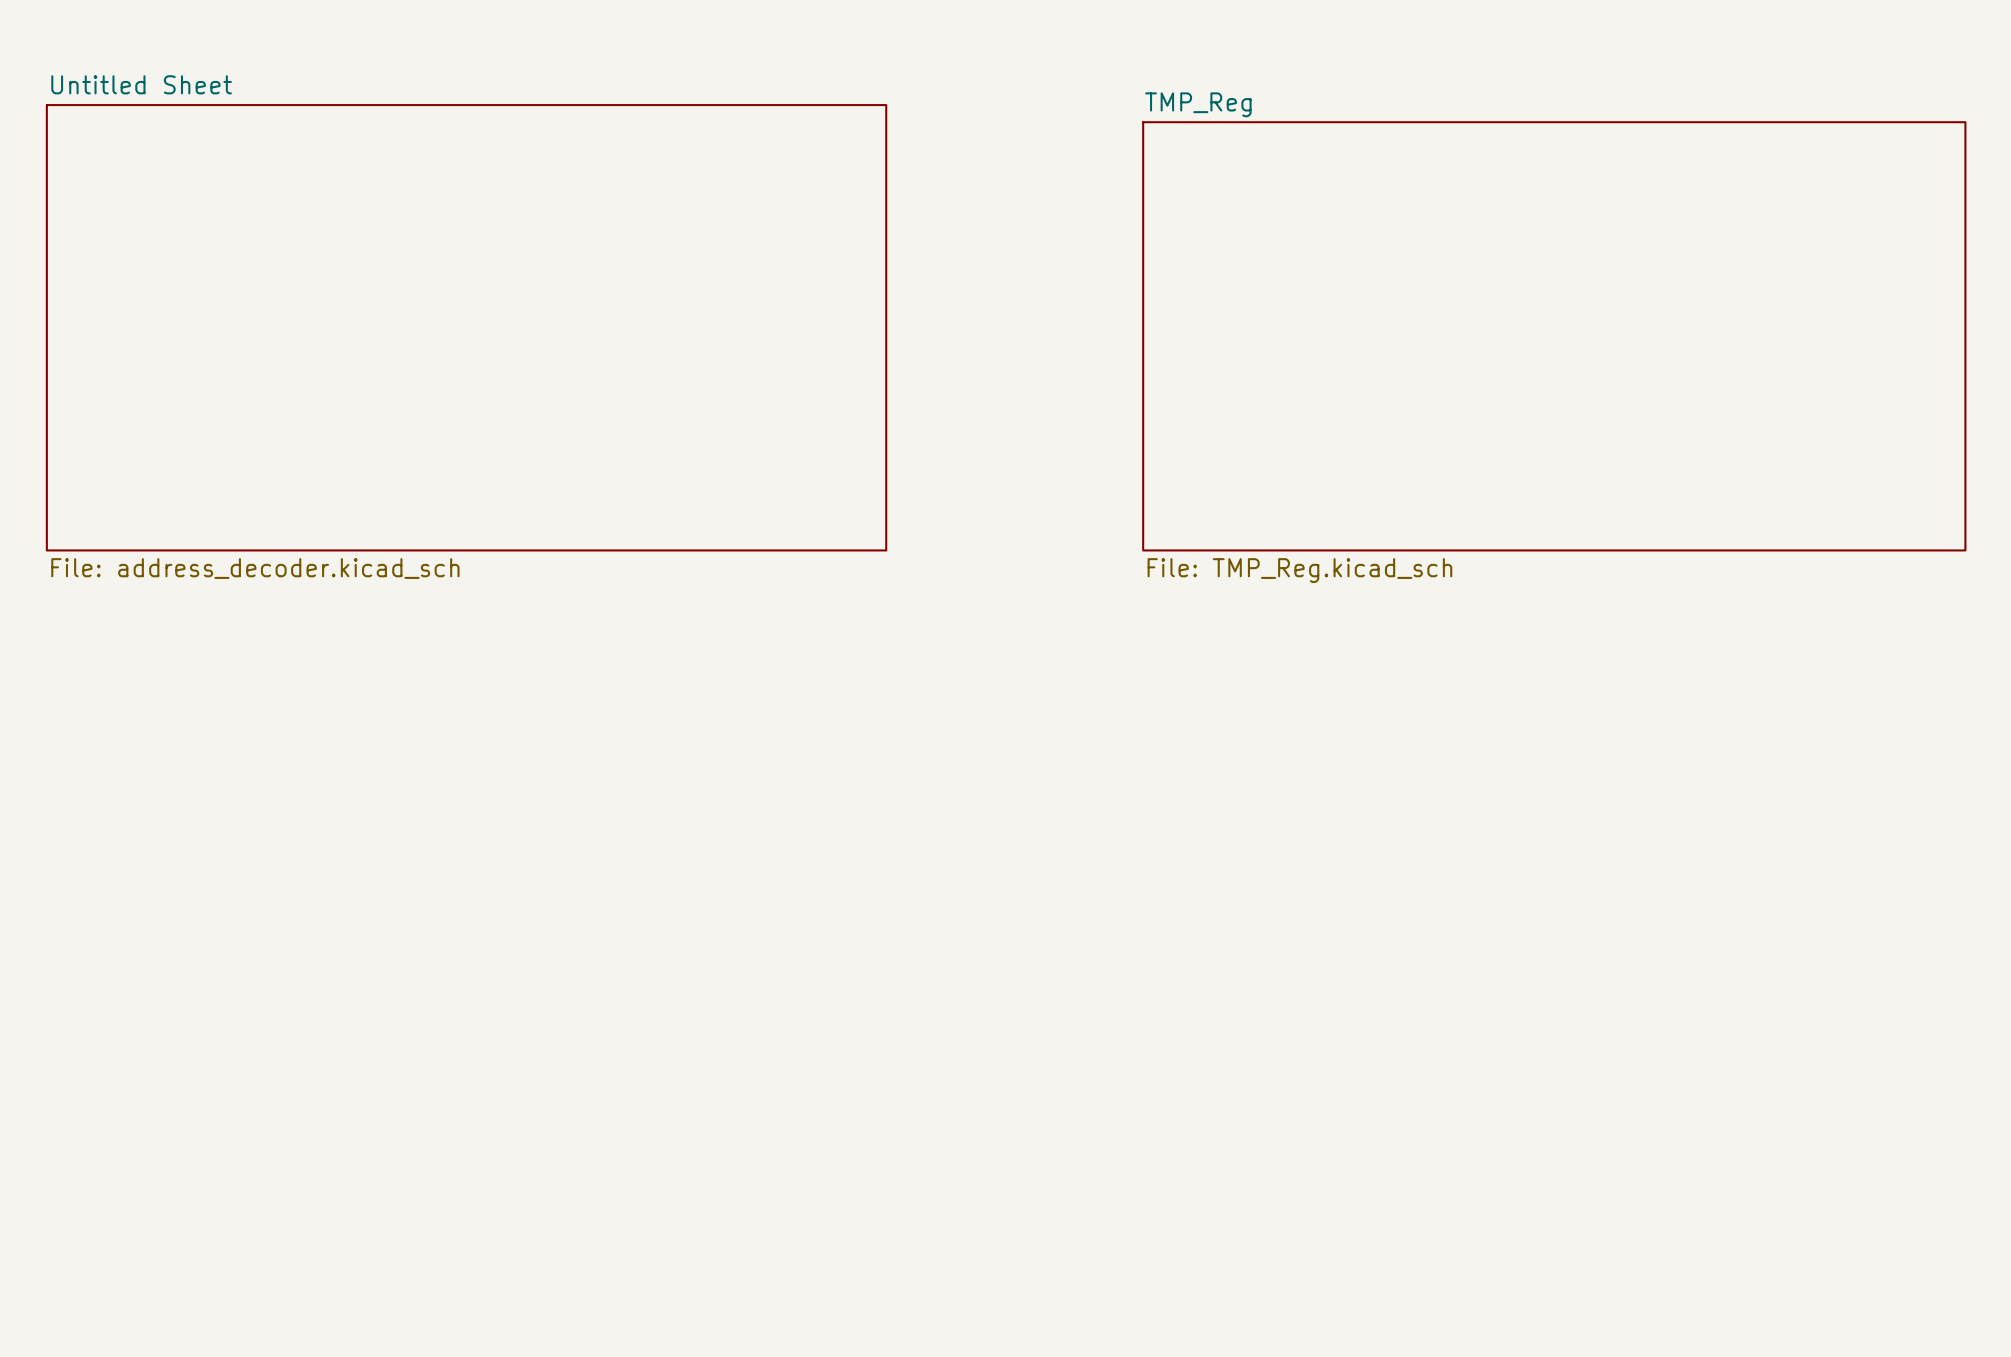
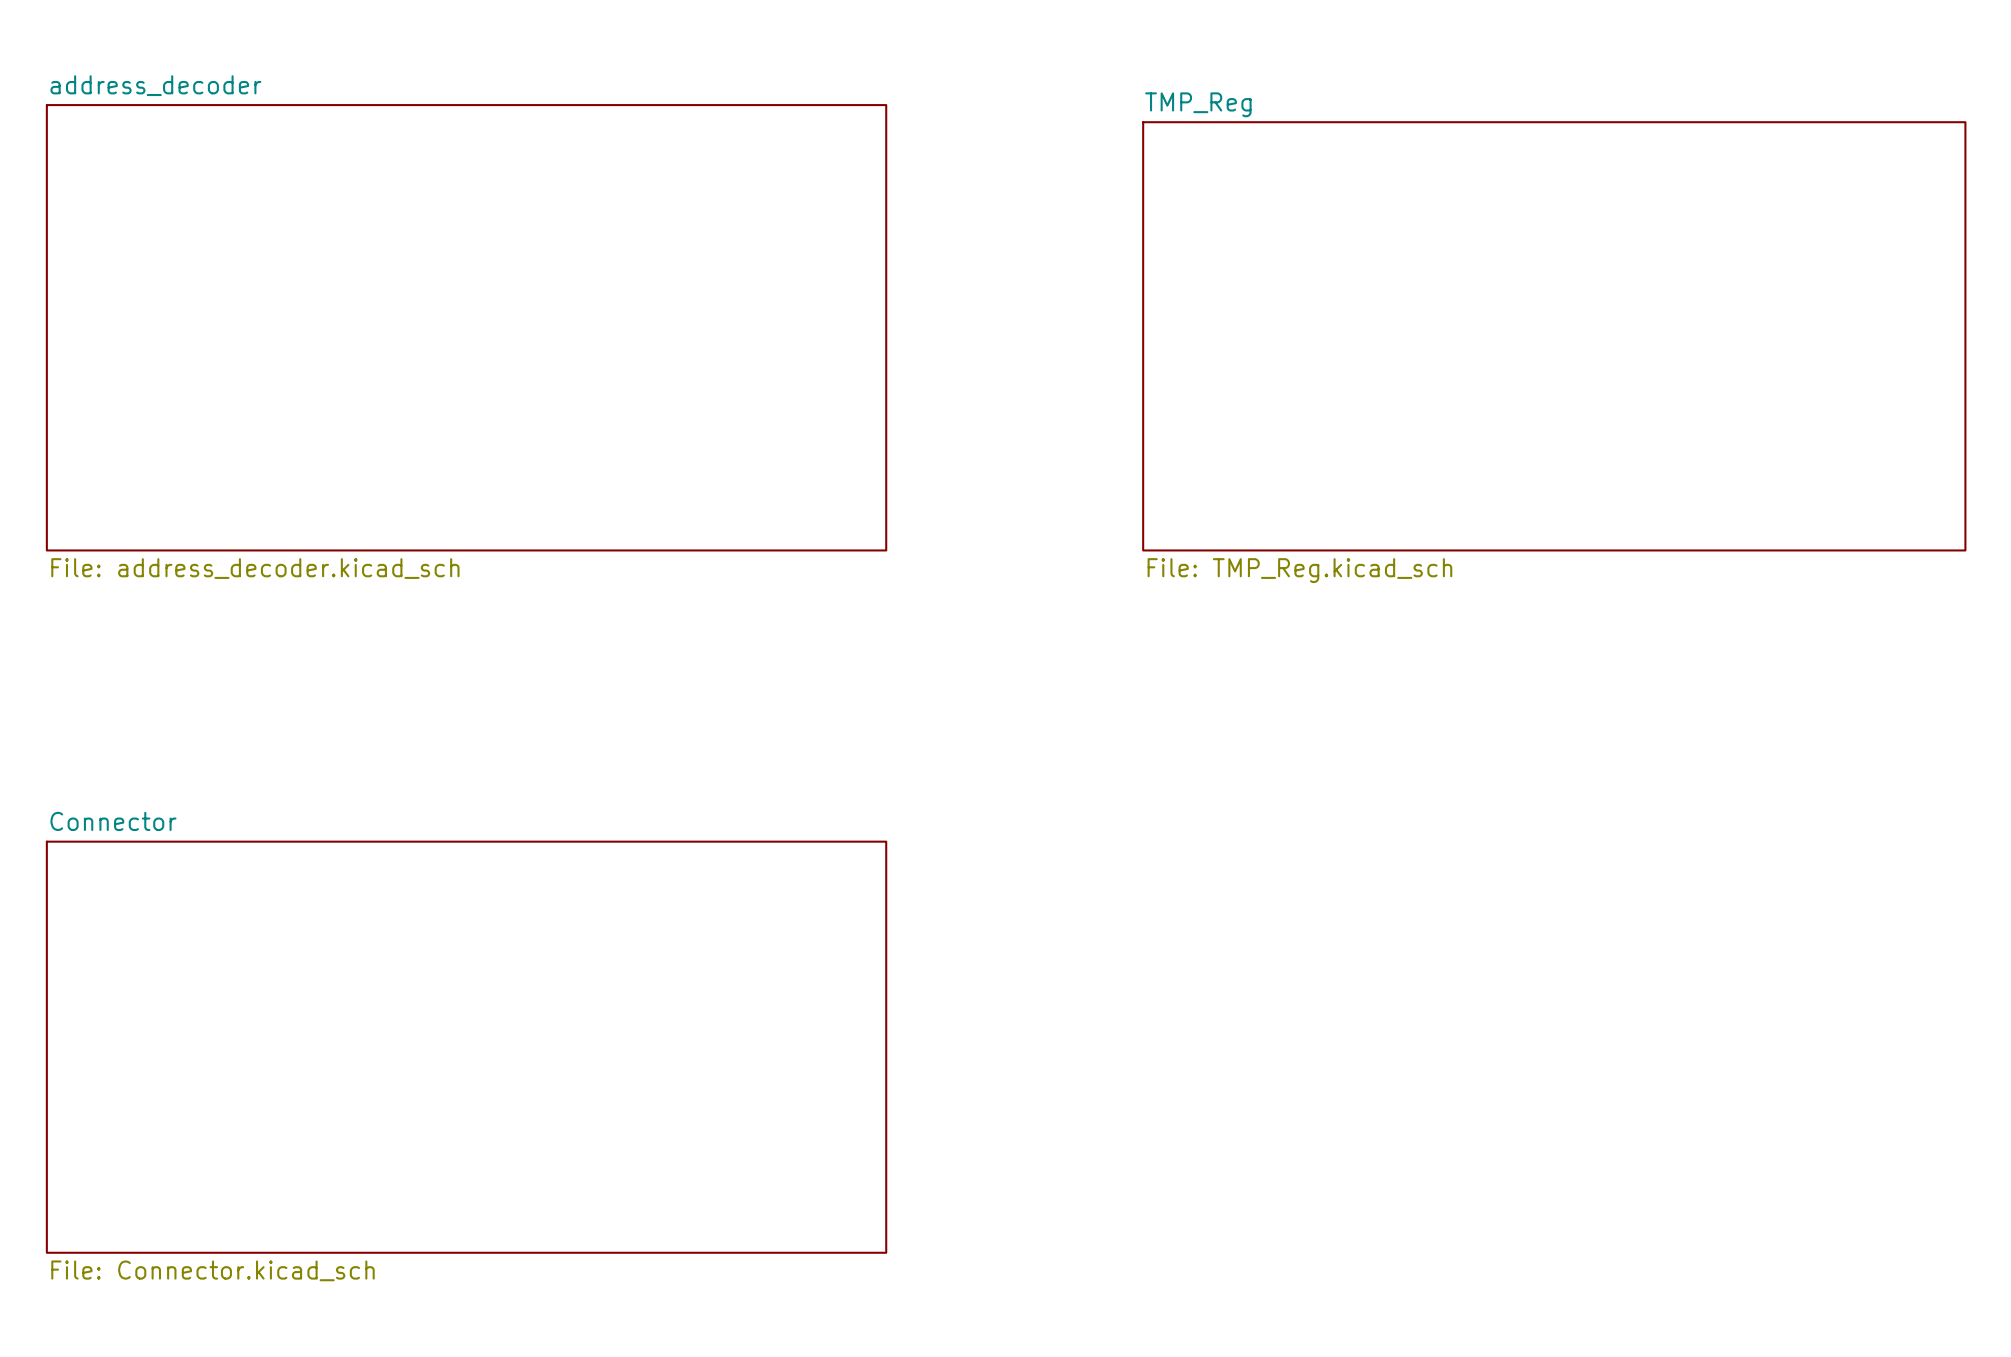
sheet Untitled Sheet name: Untitled Sheet (141, 84) -> address_decoder (155, 85)
sheet Connector: none -> File: Connector.kicad_sch (466, 1047)

